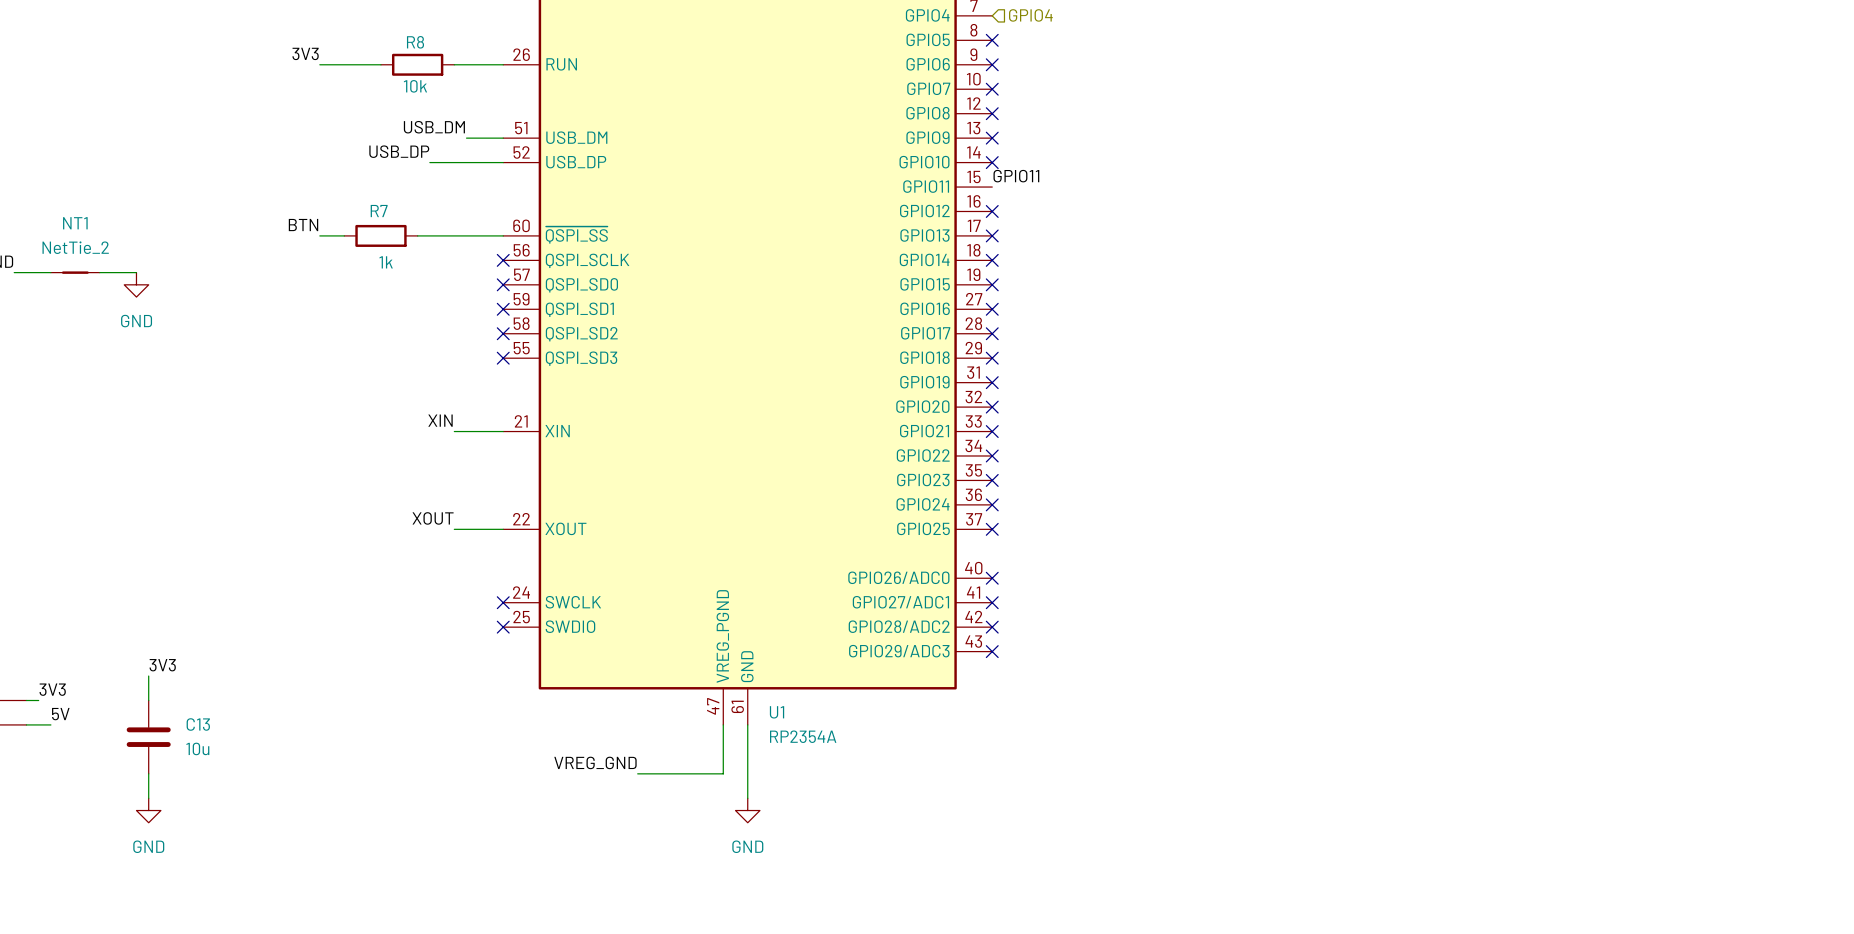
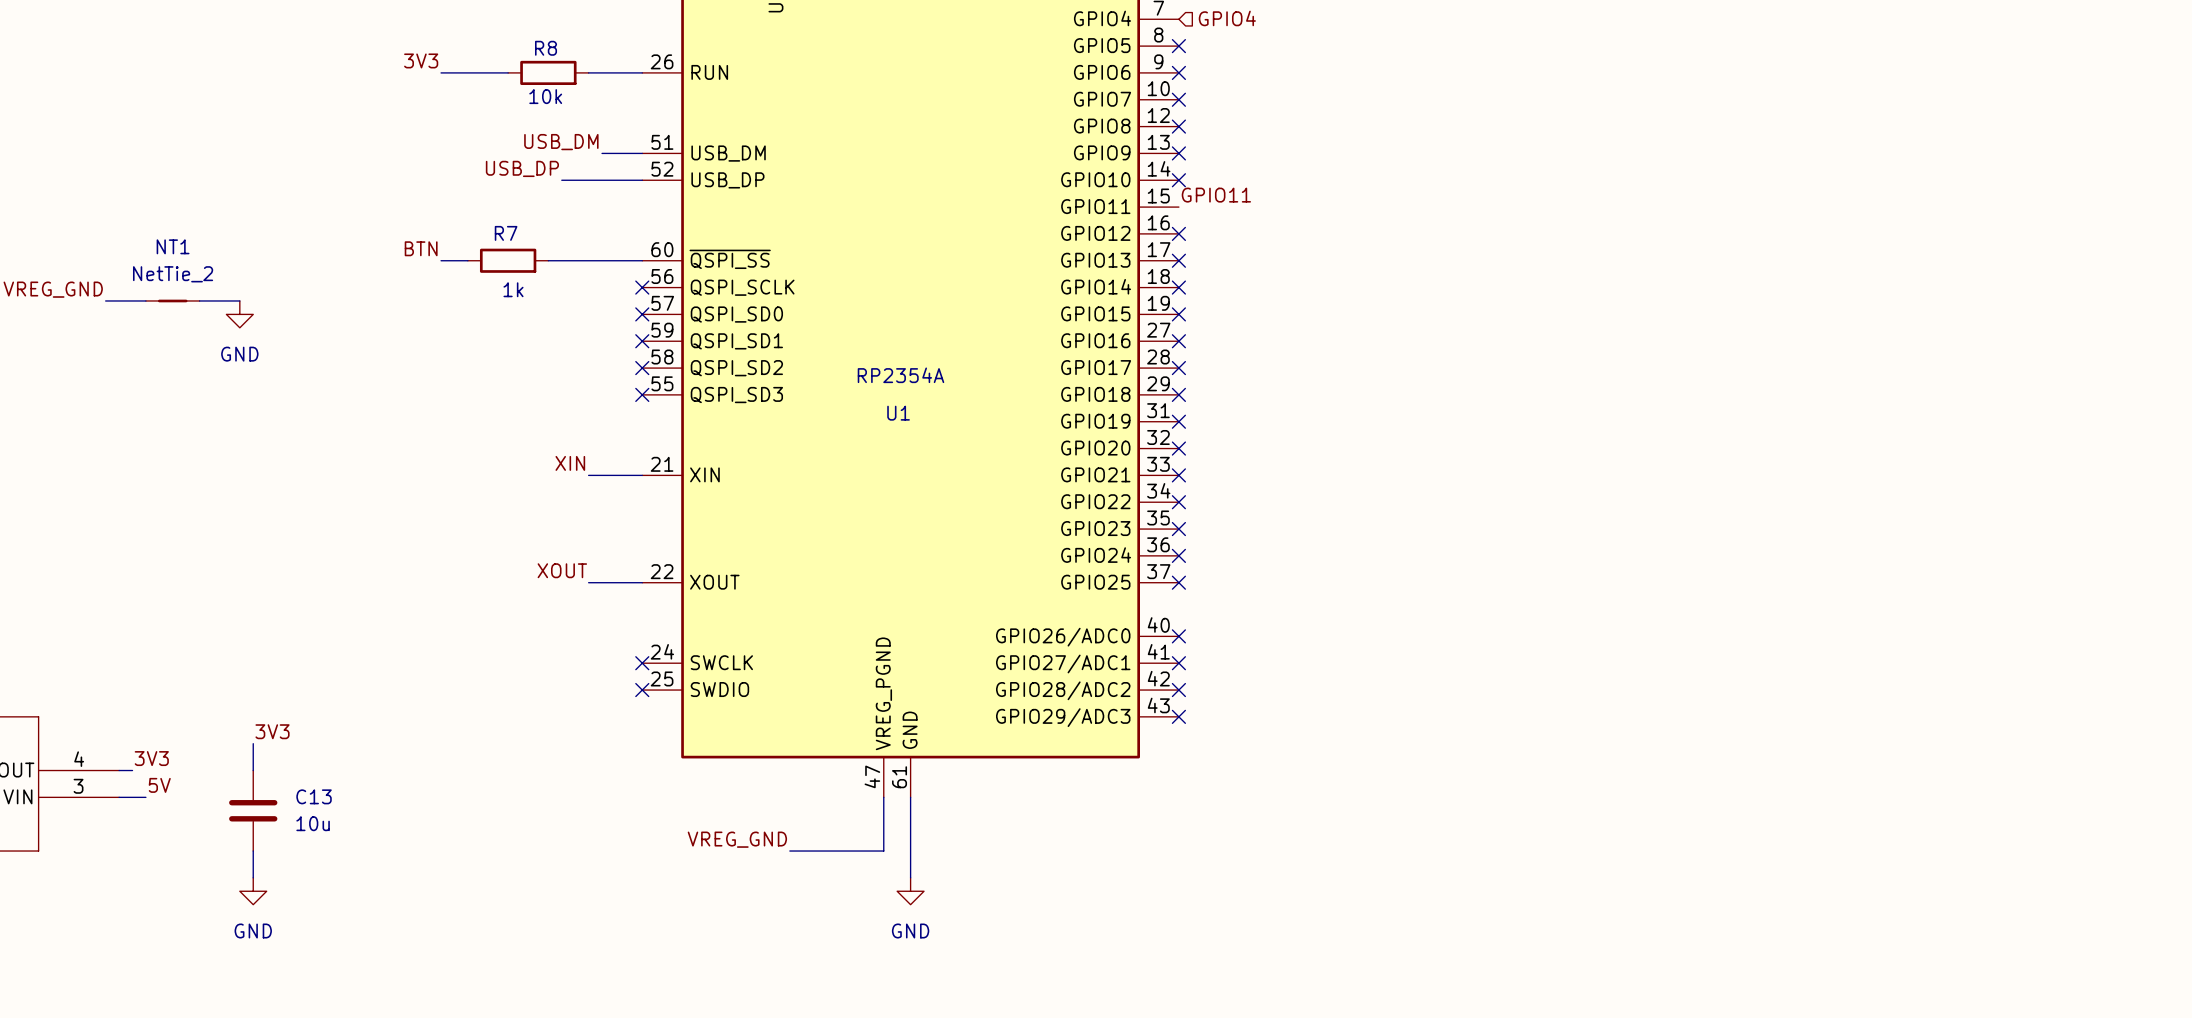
U1 name position: U1 (777, 712) -> U1 (898, 413)
U1 value position: RP2354A (803, 736) -> RP2354A (900, 375)

